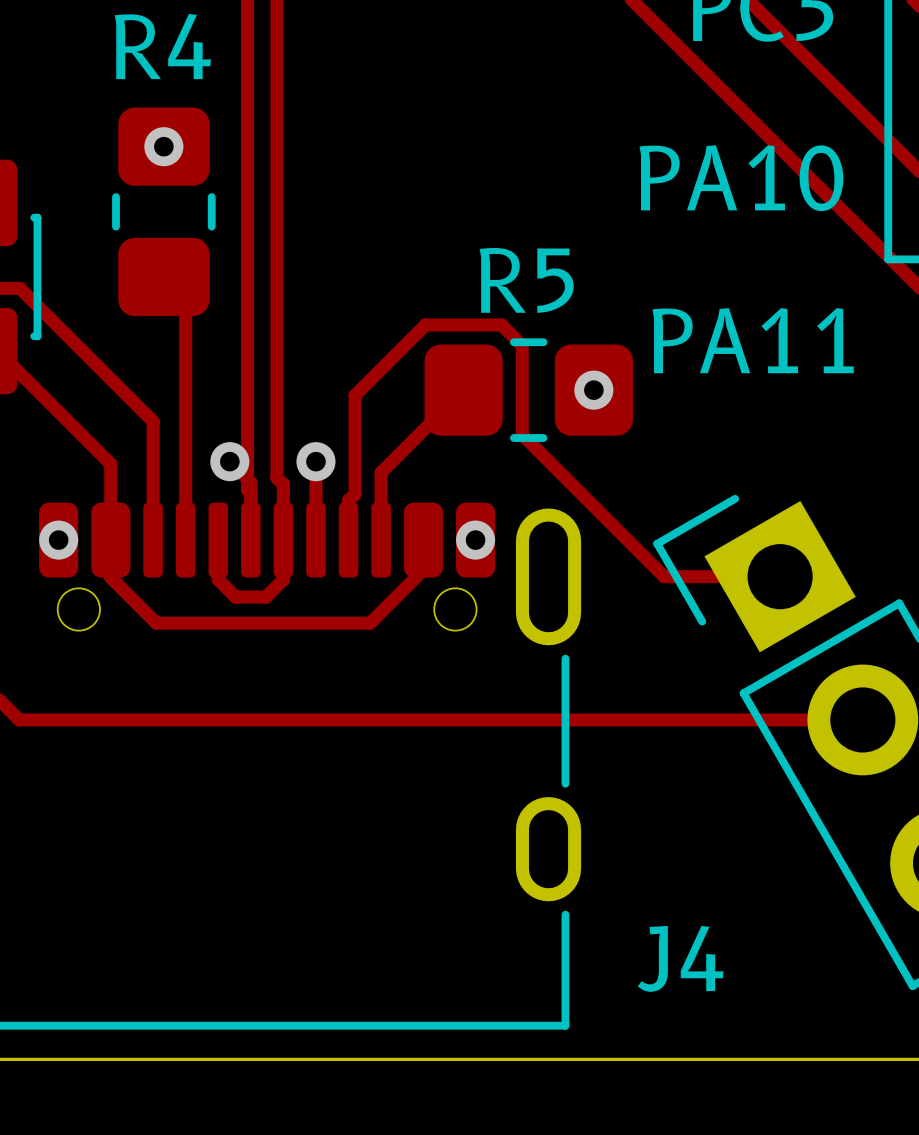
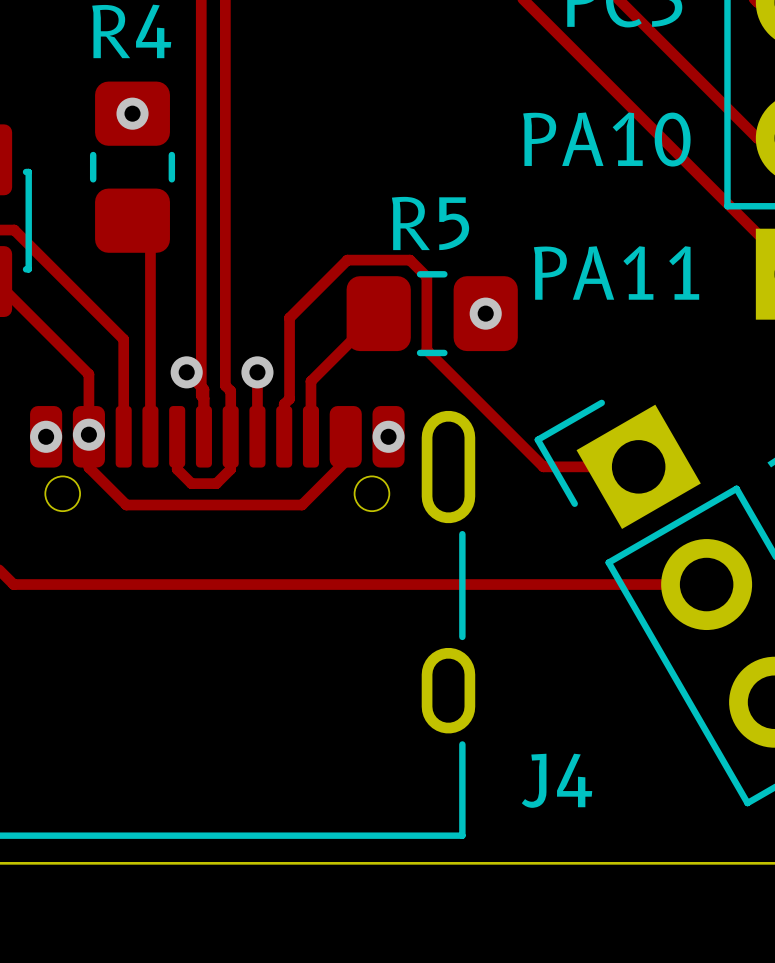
via: none -> (88, 434)

